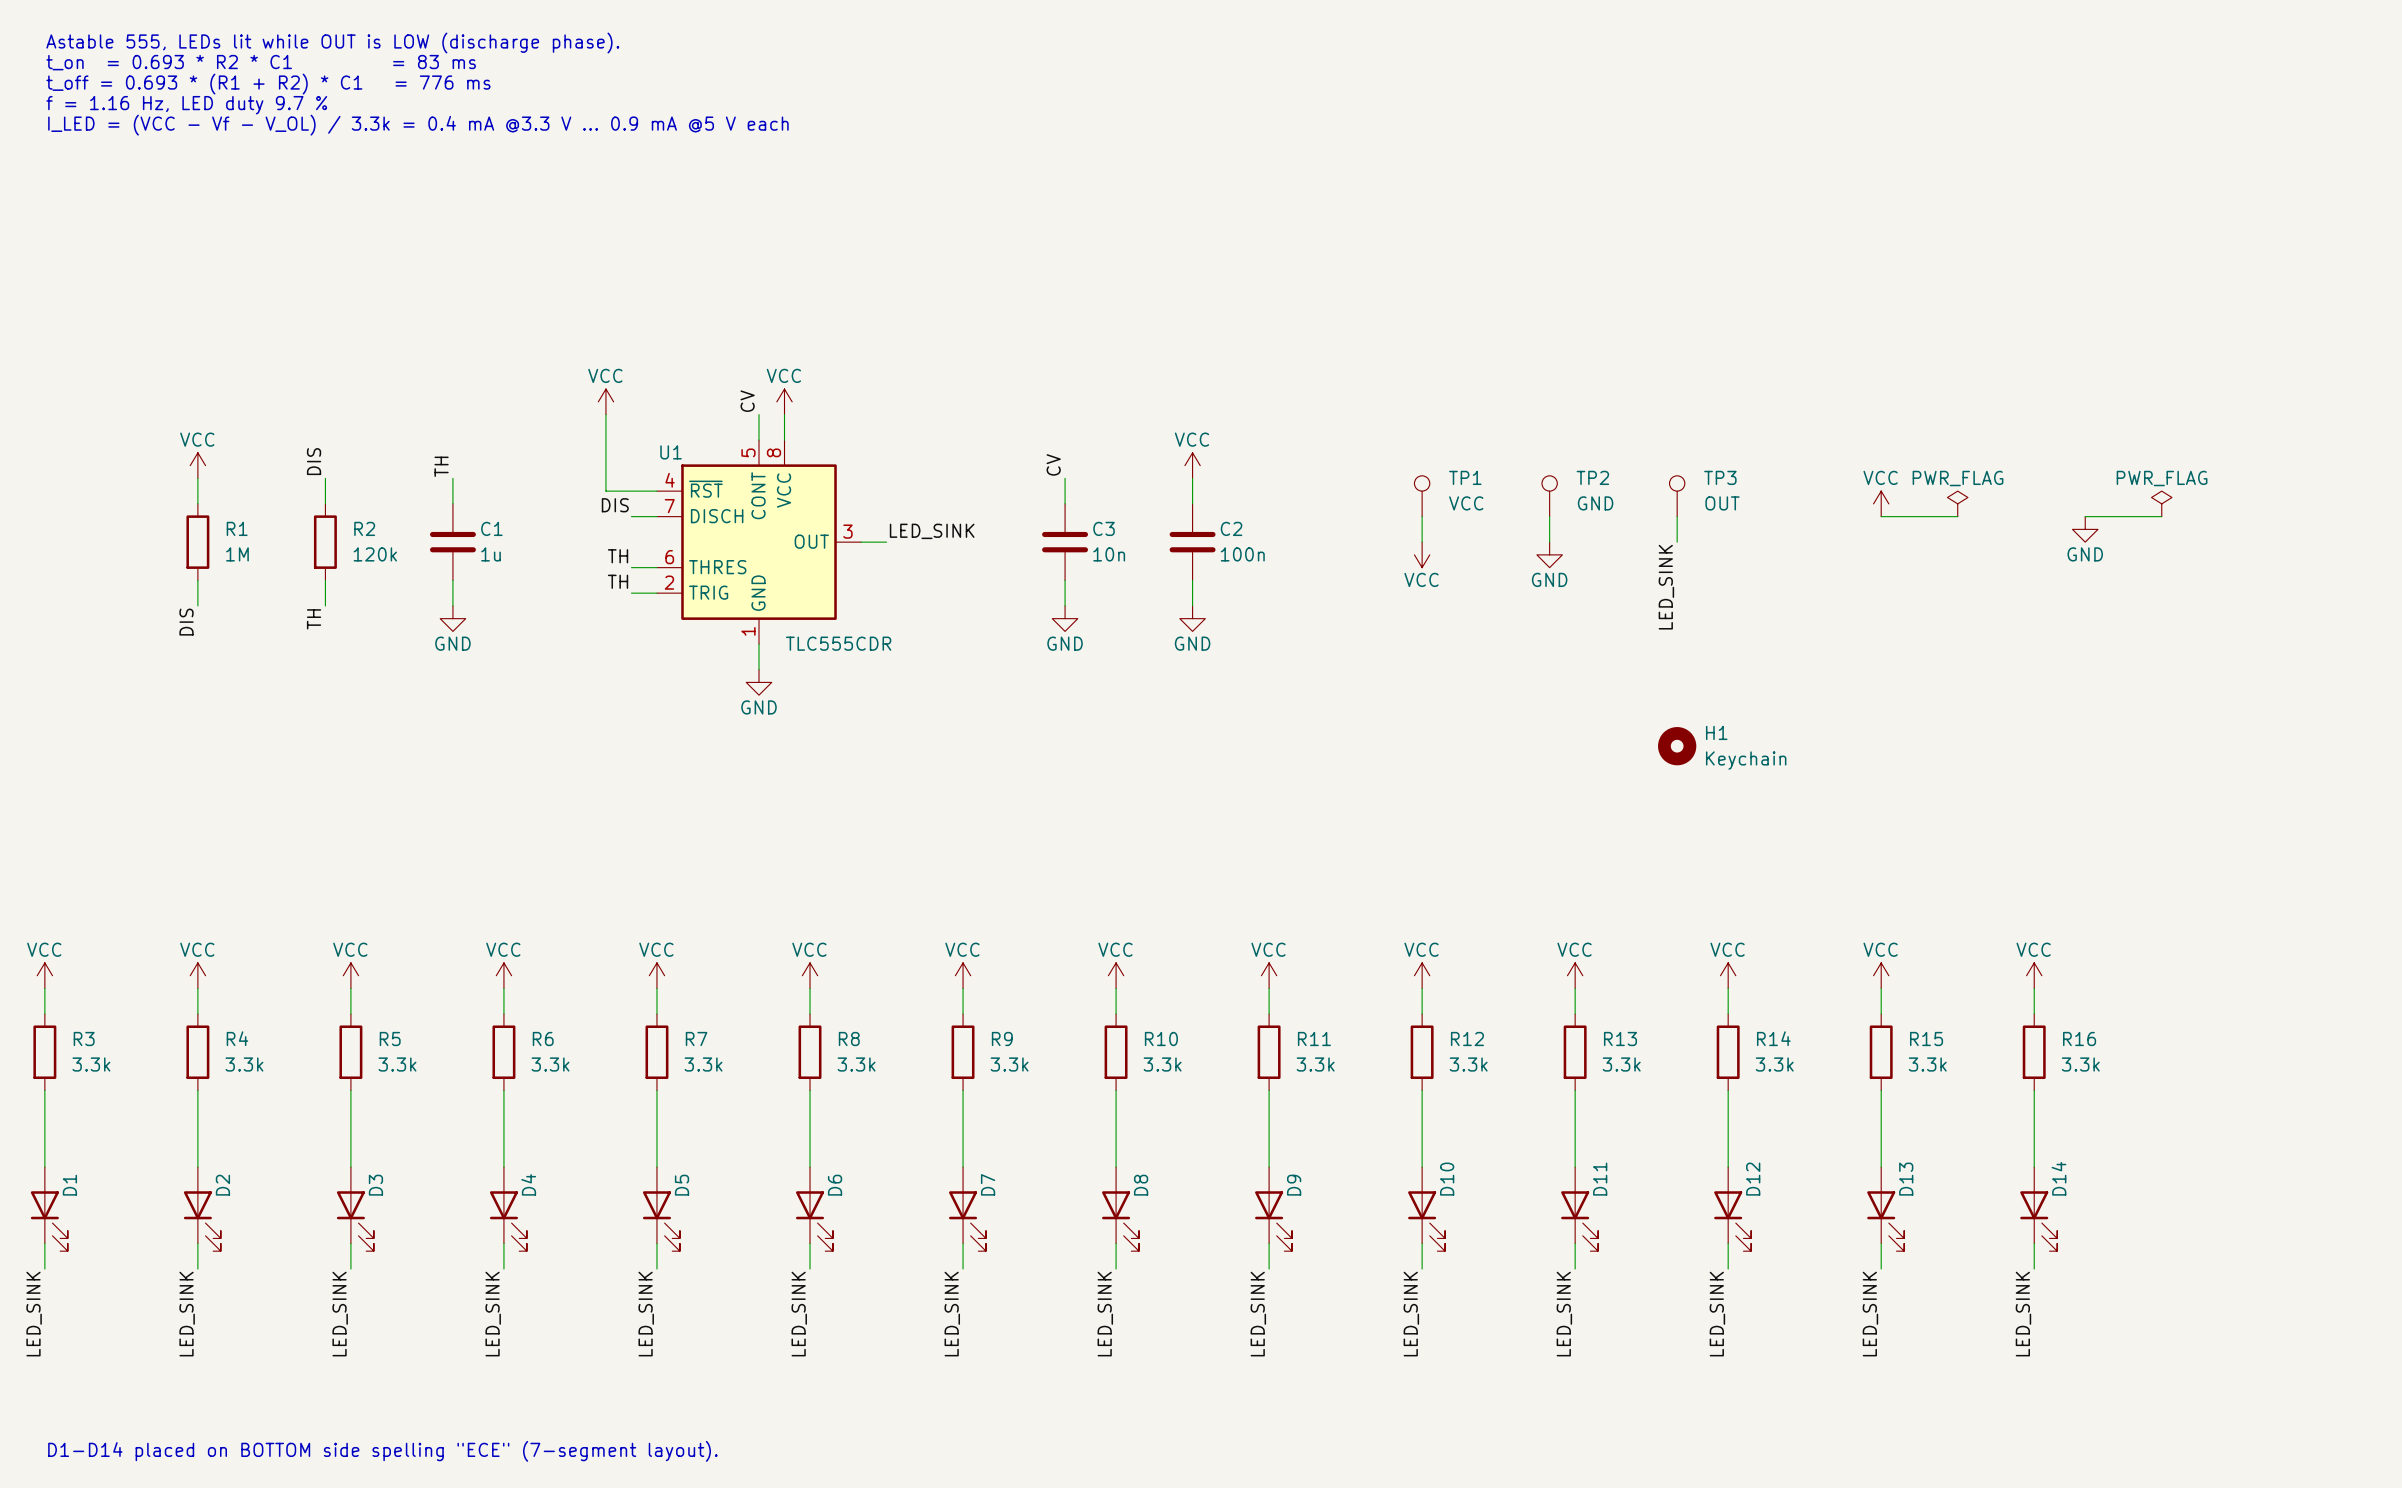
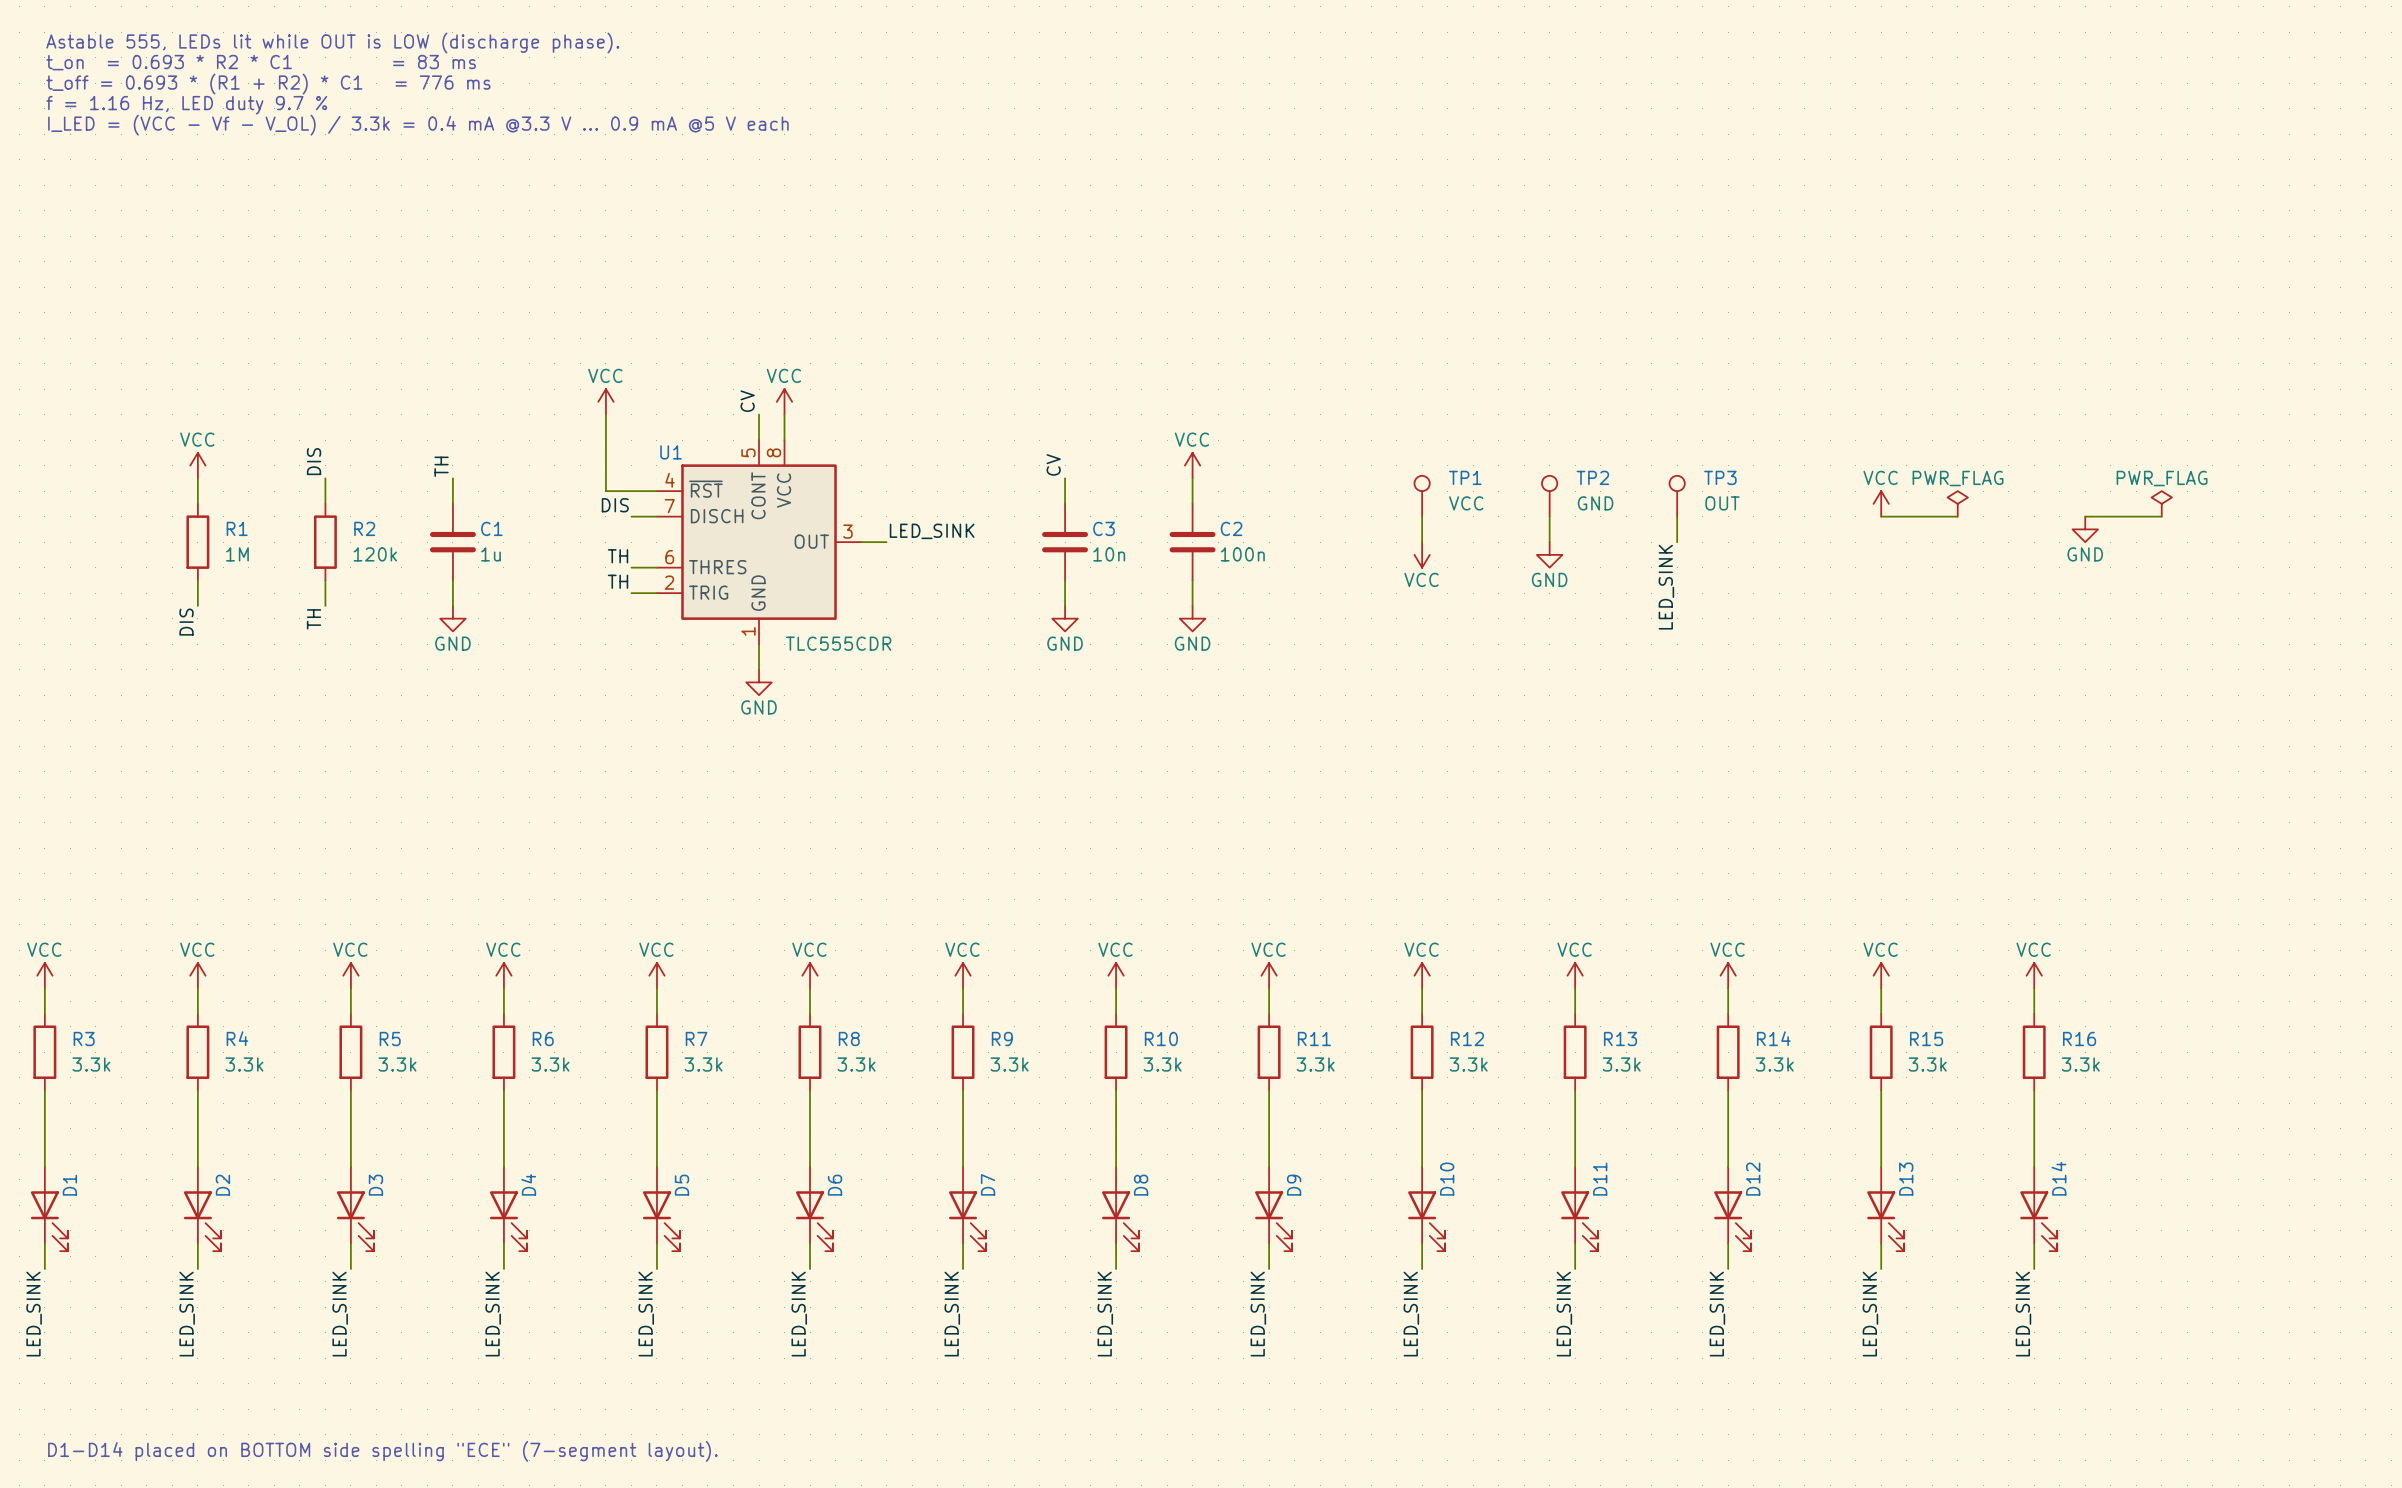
H1: Keychain (1677, 746) -> none

